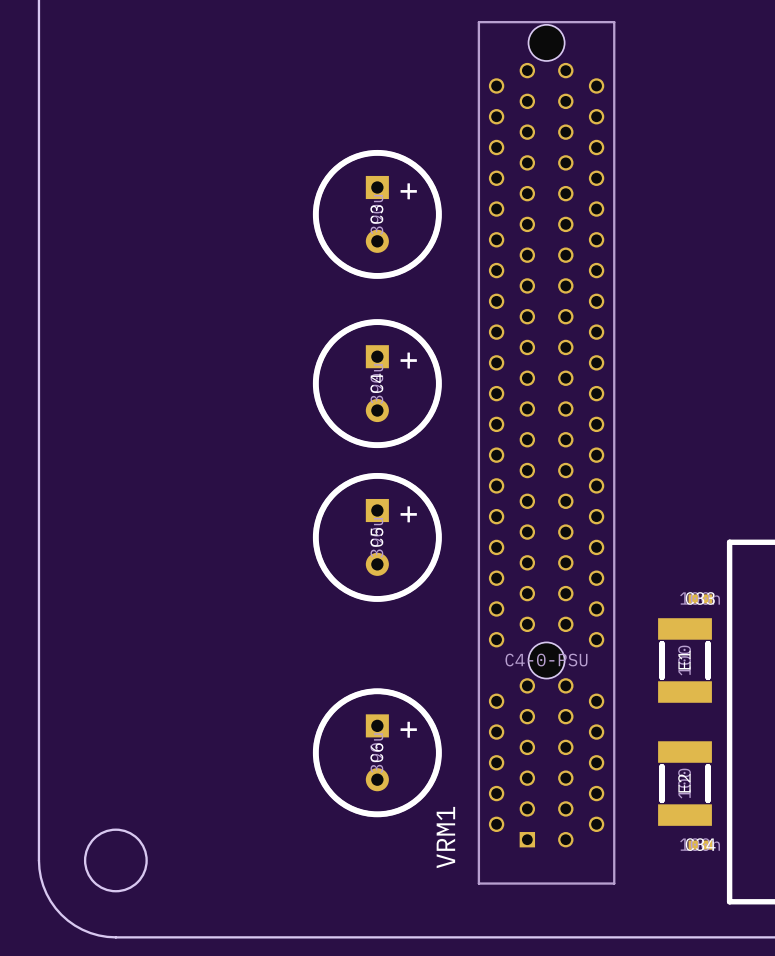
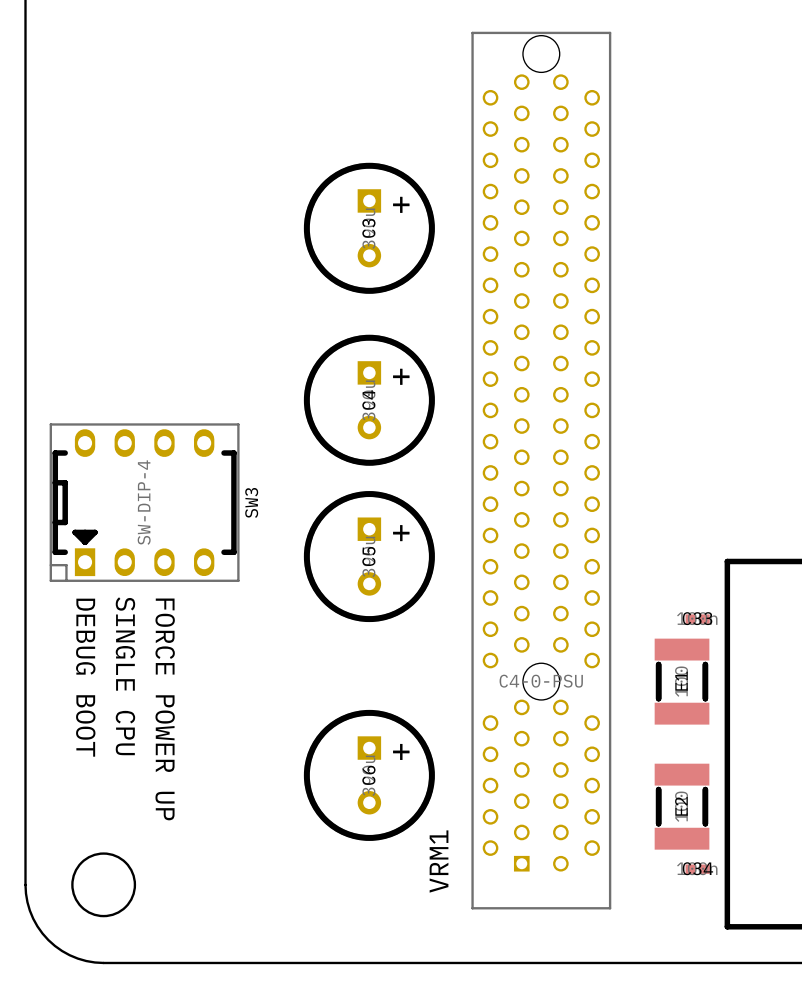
SW3: none -> SW-DIP-4 (144, 502)
text: none -> SINGLE CPU (125, 676)
text: none -> DEBUG BOOT (85, 677)
text: none -> FORCE POWER UP (165, 709)

